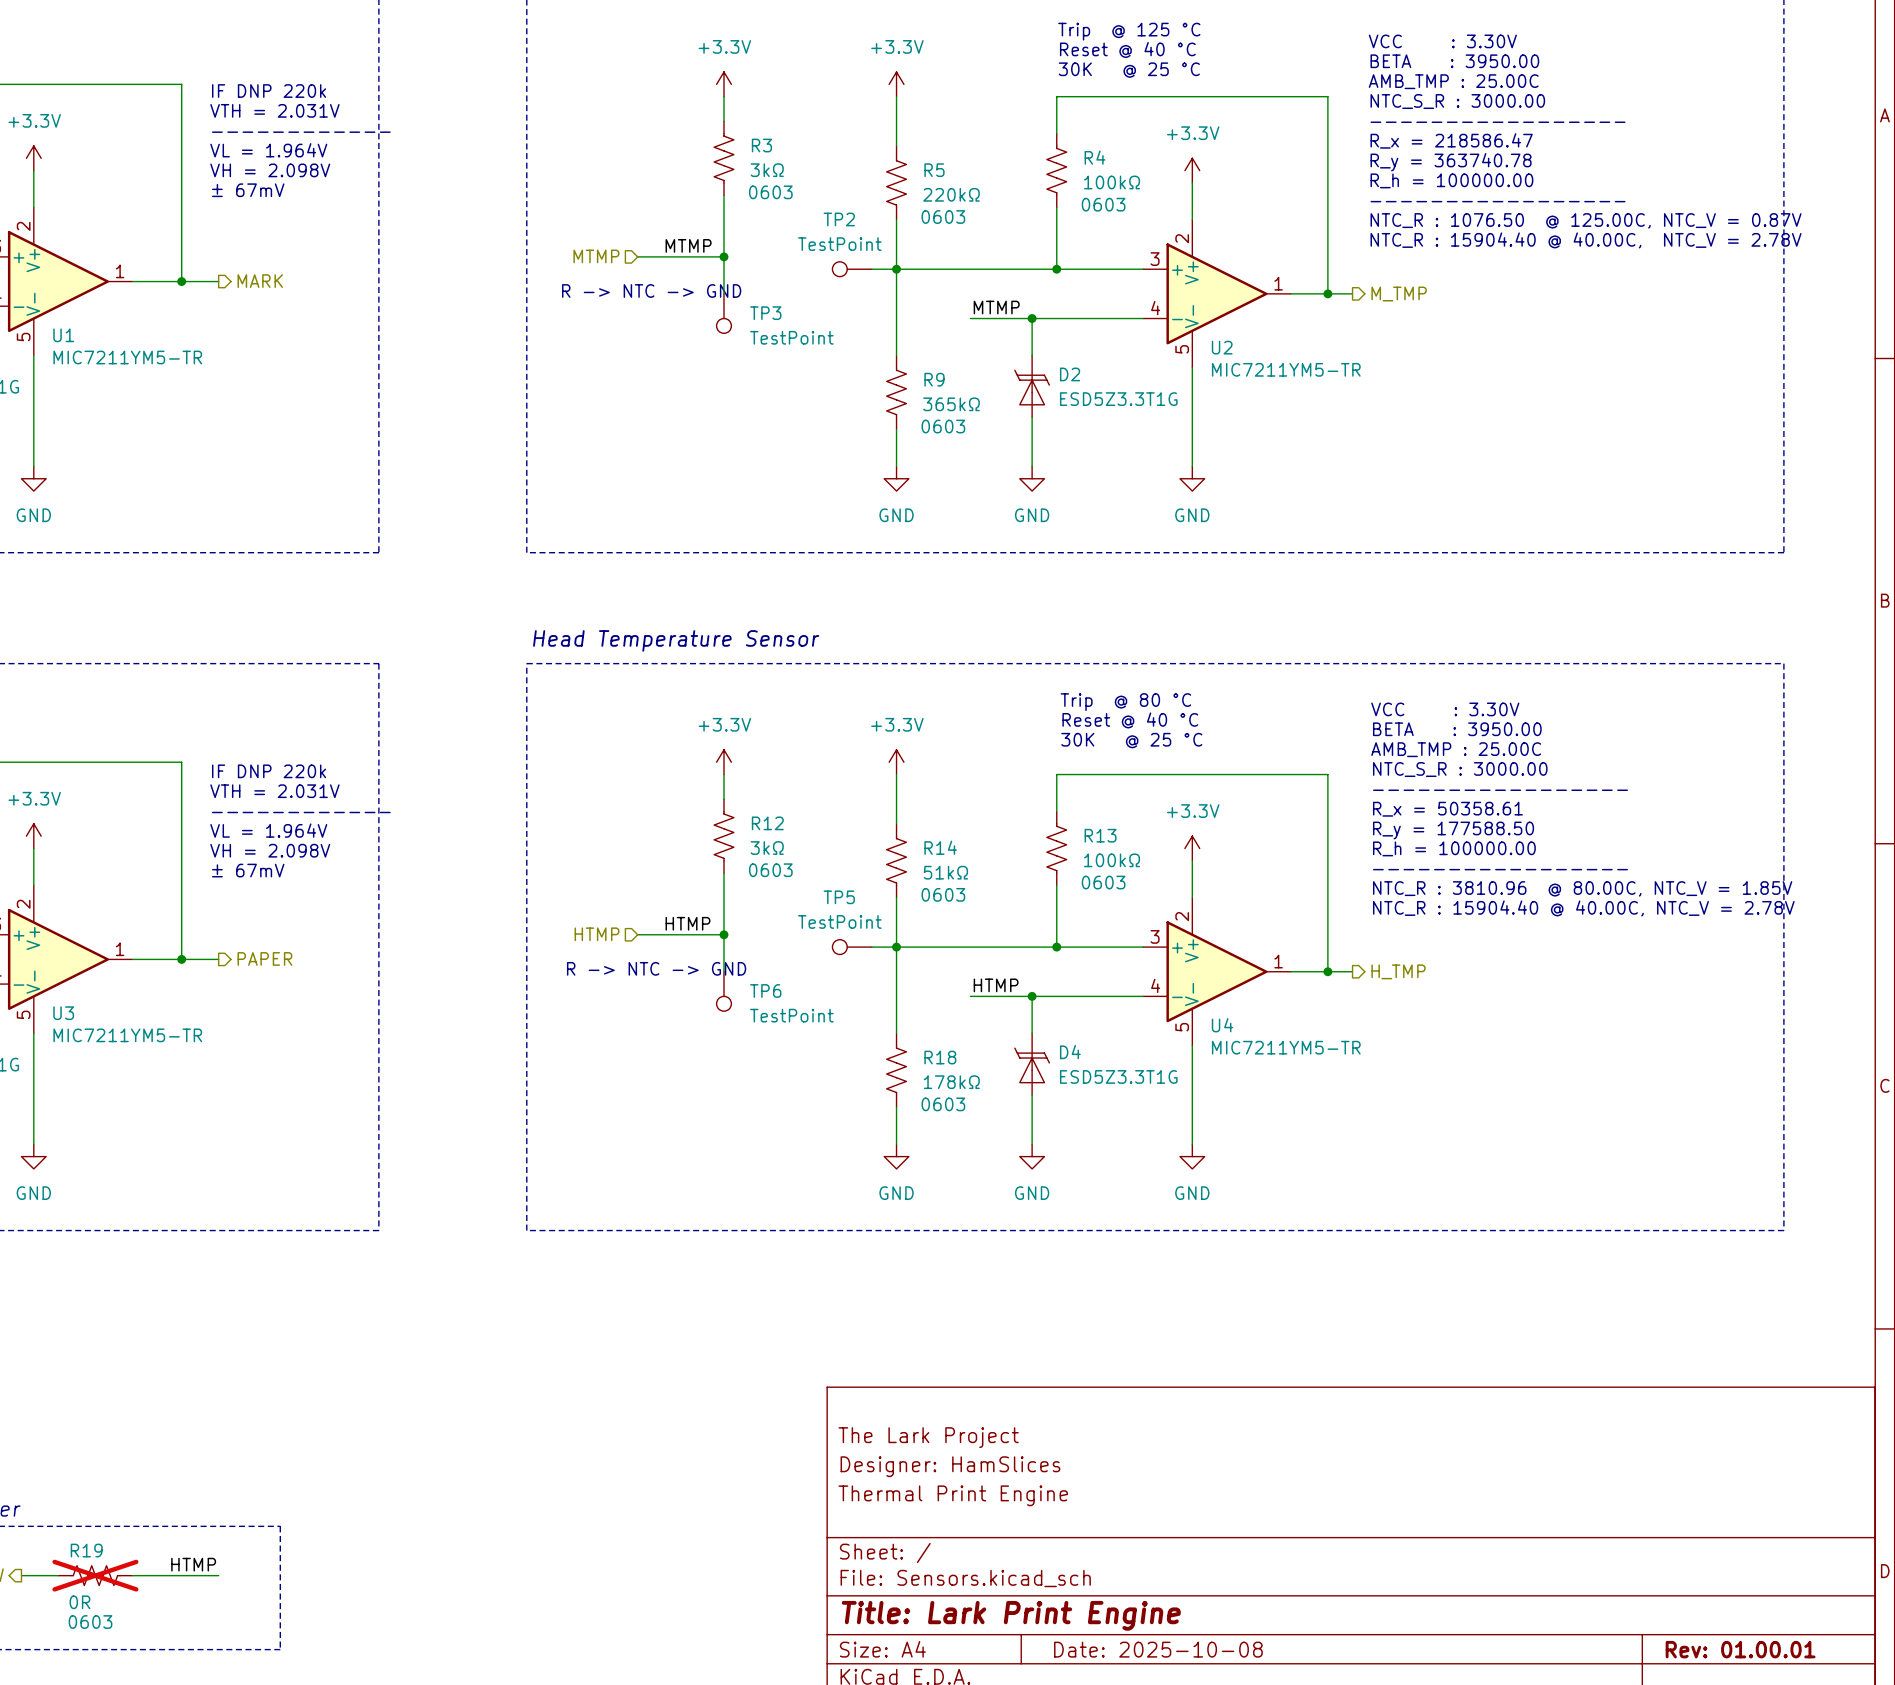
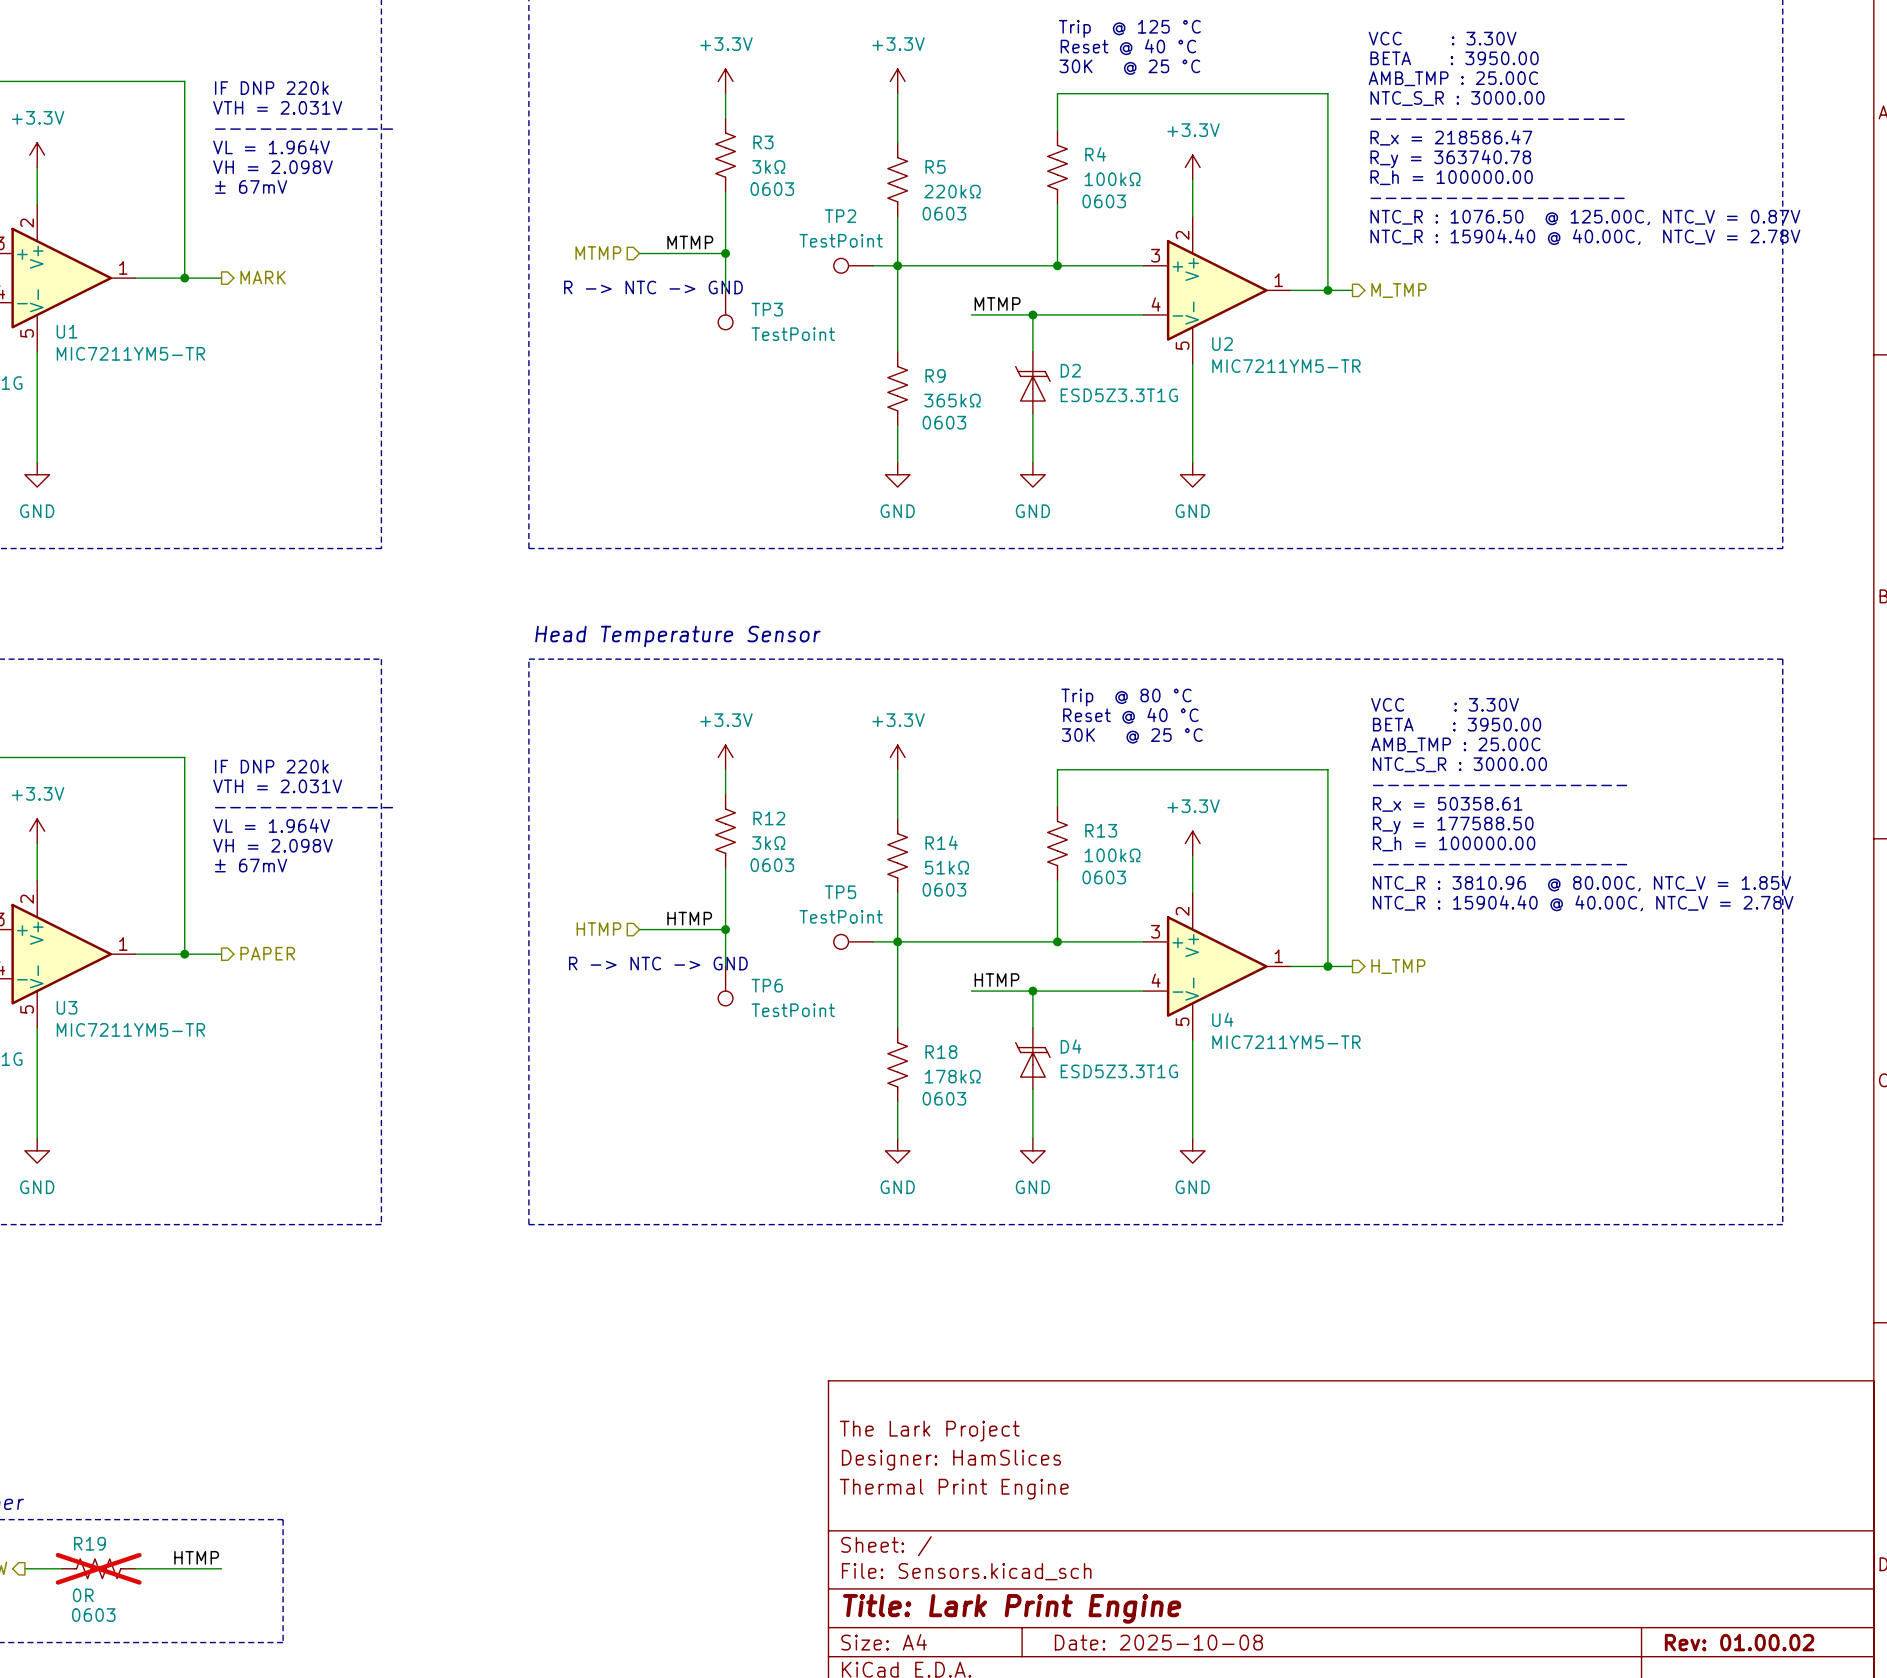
title block: Rev: 01.00.01 (1740, 1649) -> Rev: 01.00.02 (1739, 1642)

